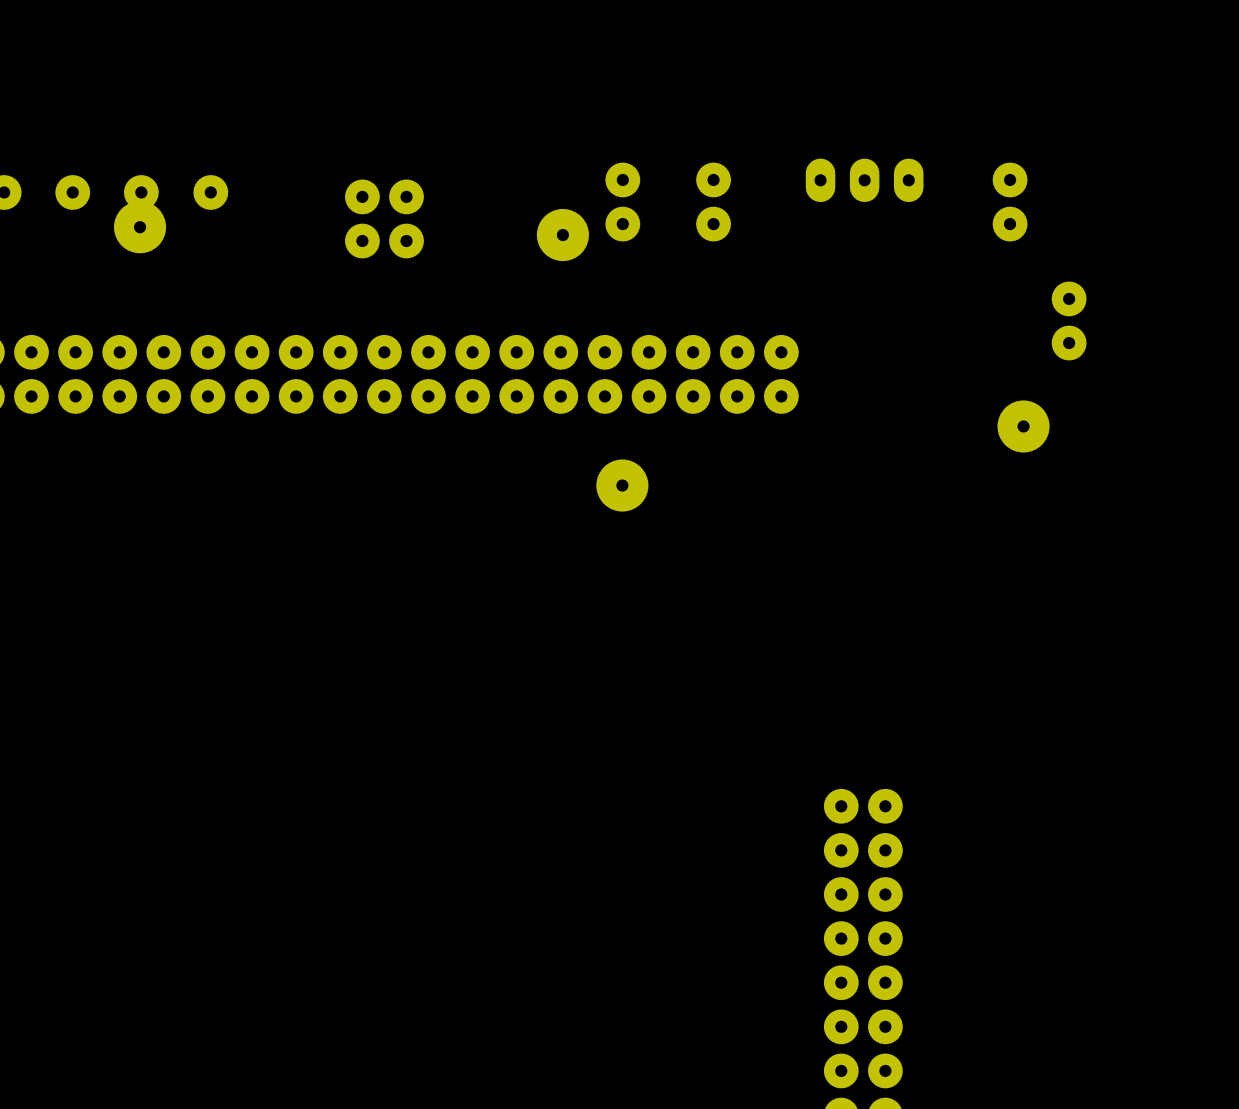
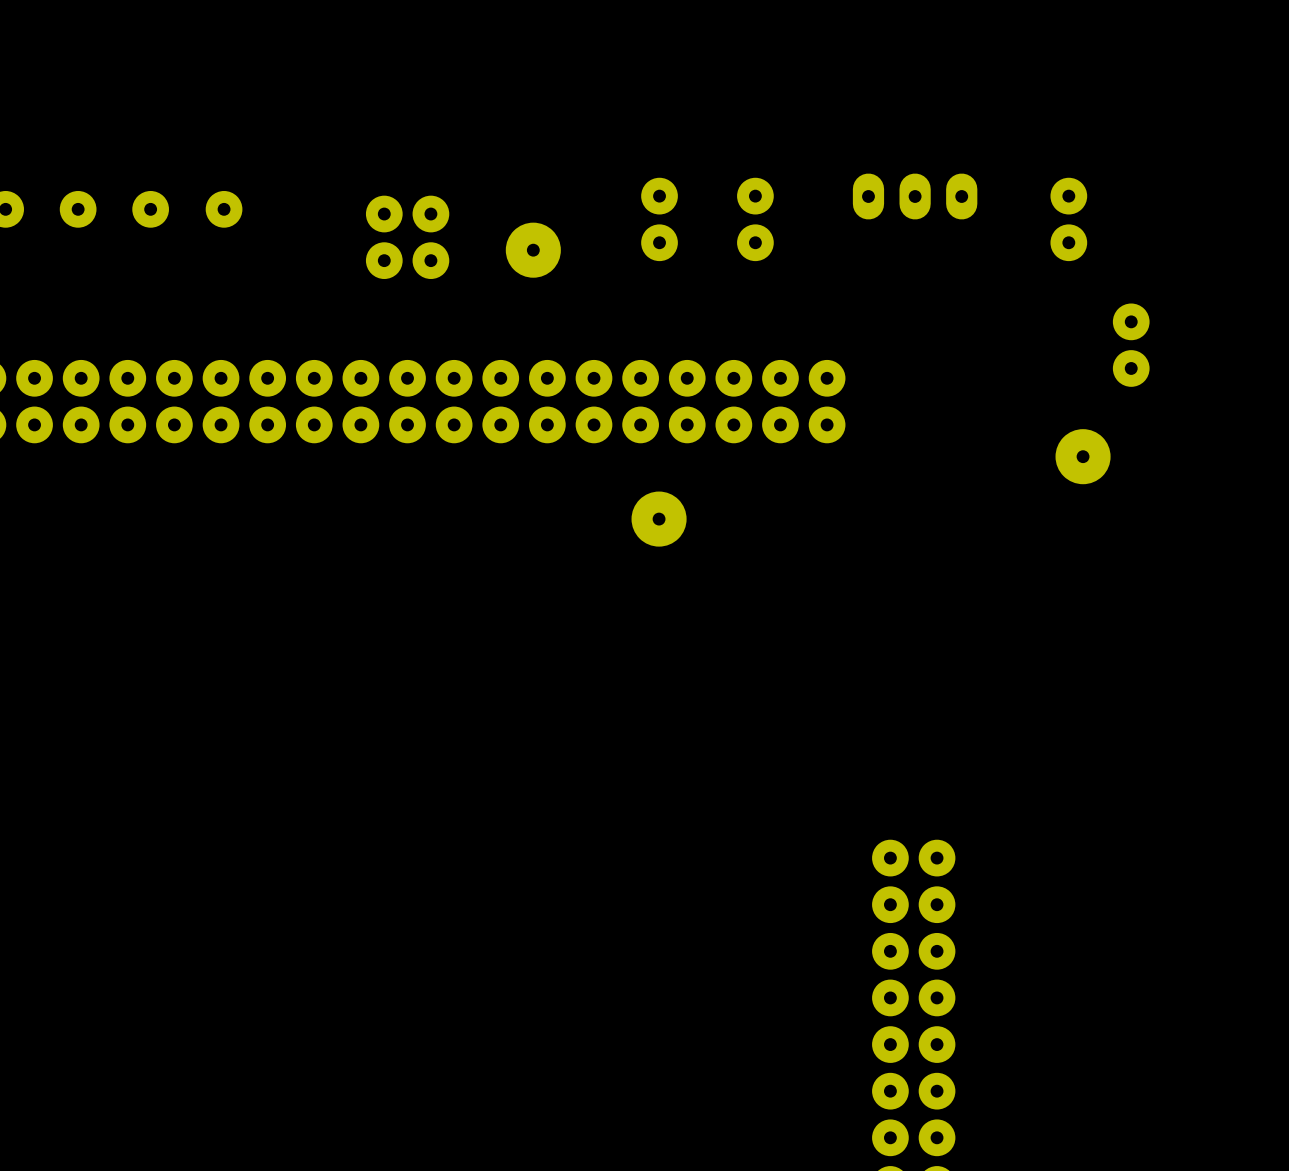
part: (140, 227) -> none
part position: (562, 235) -> (533, 250)

